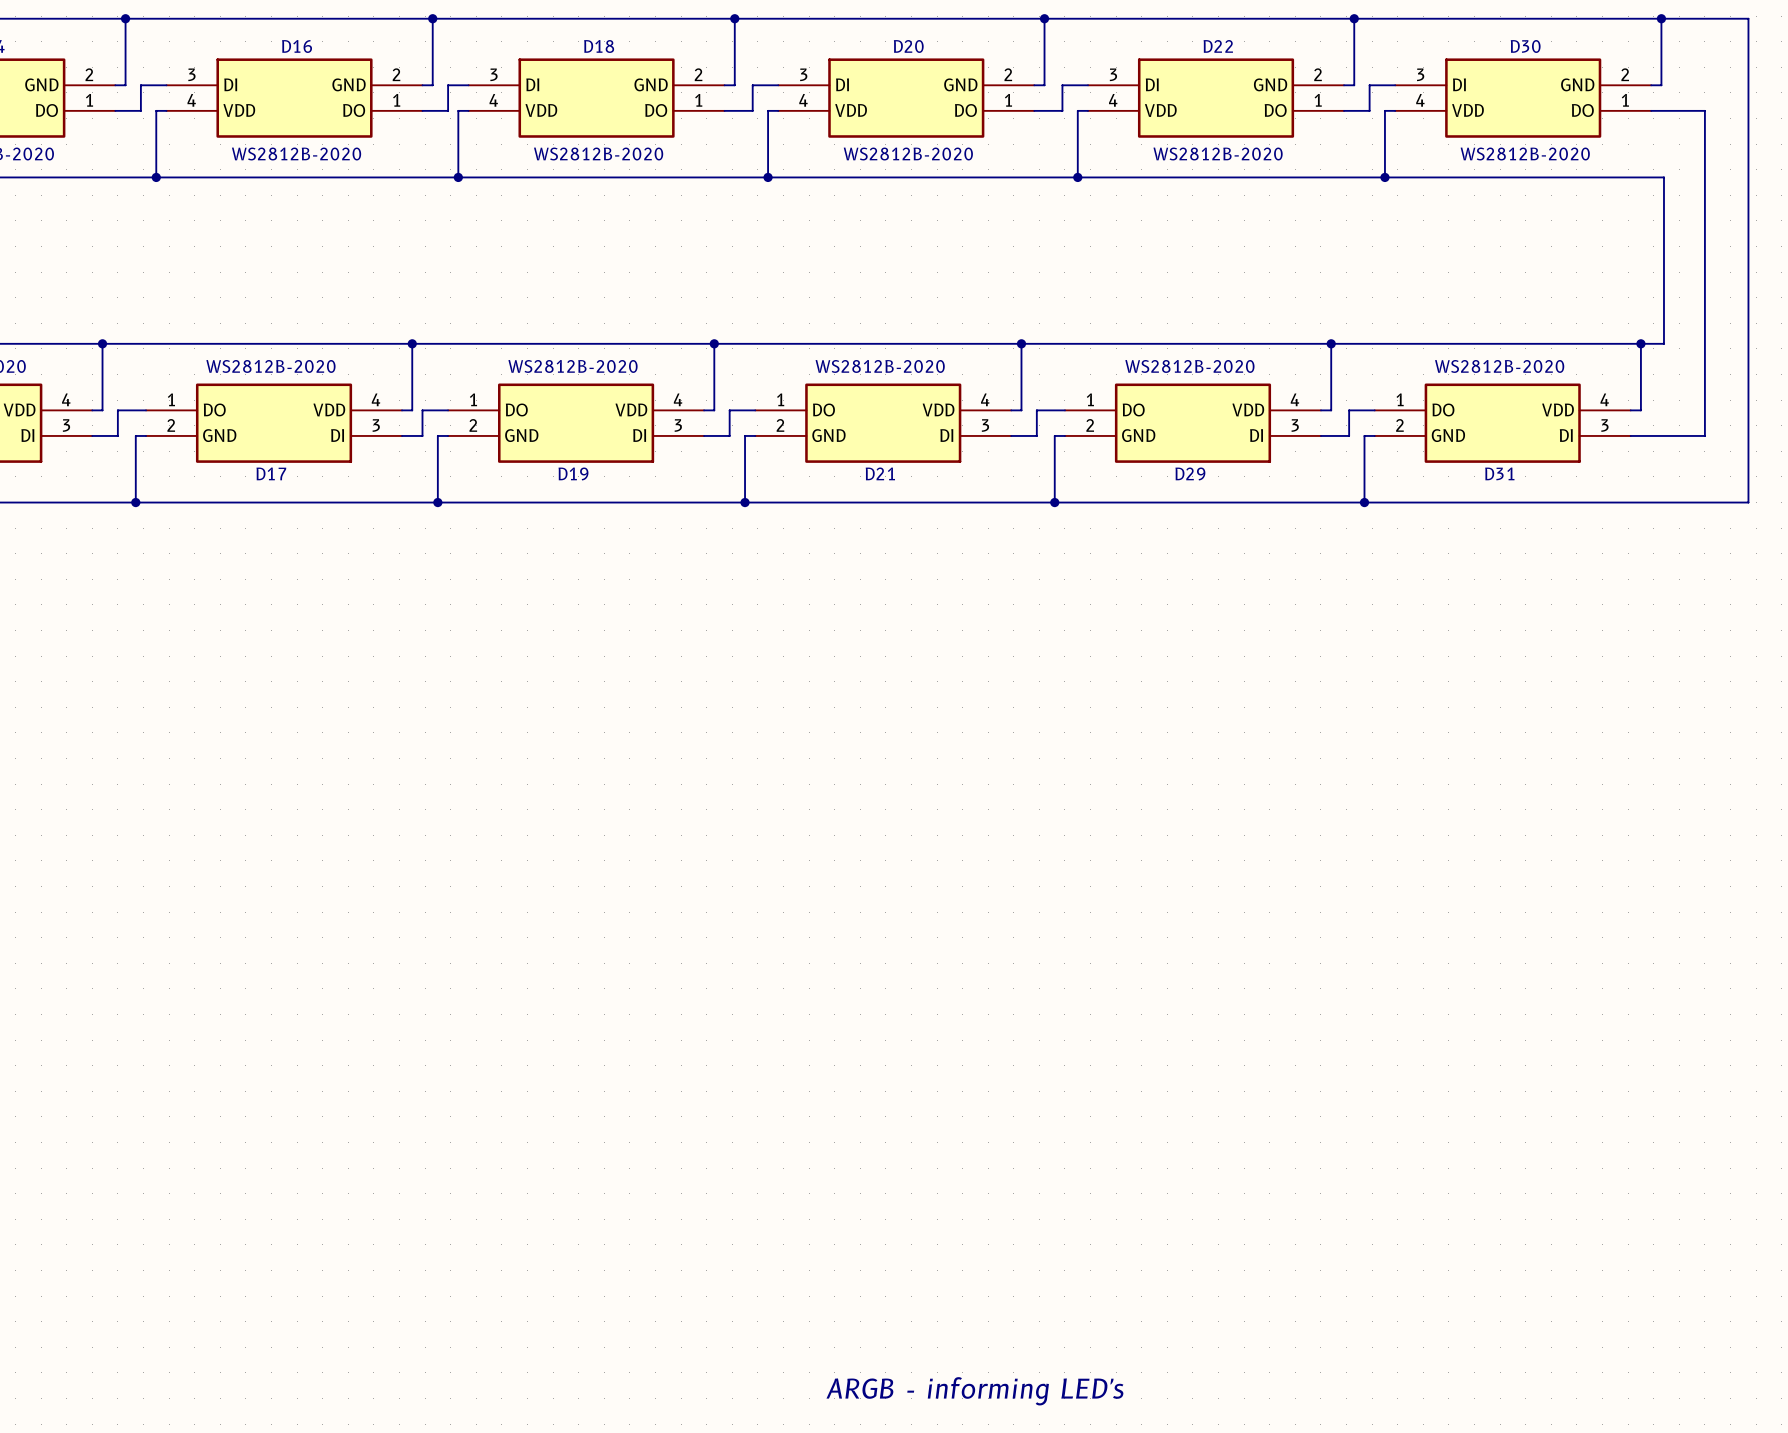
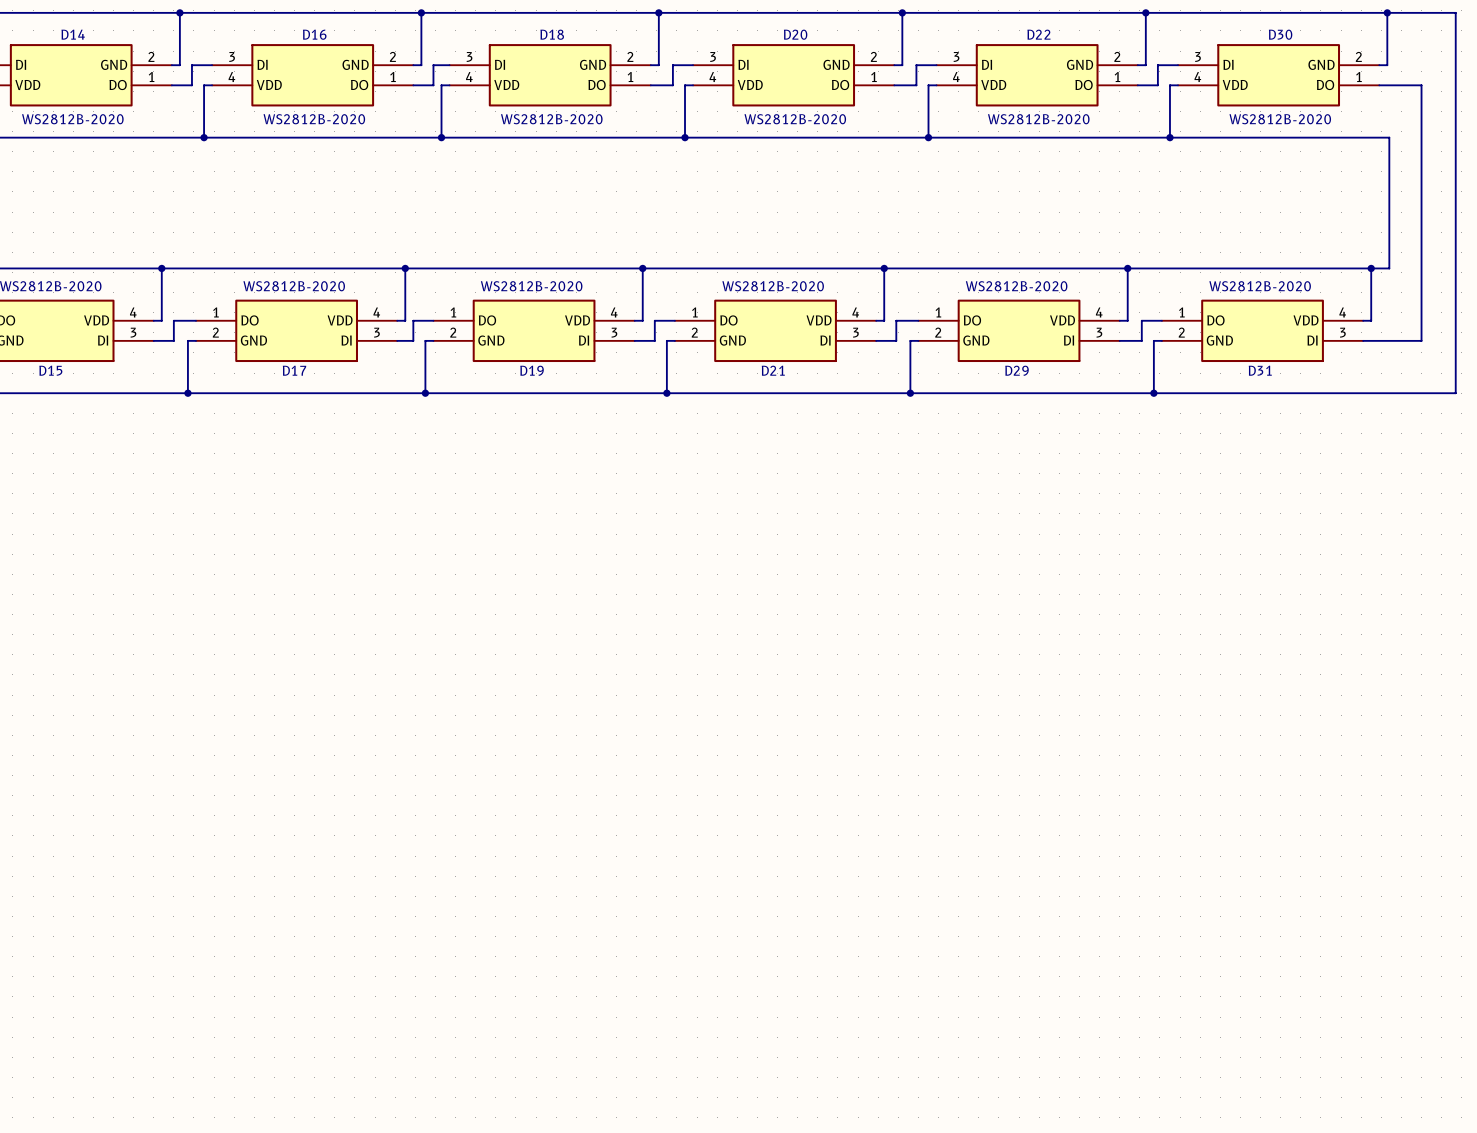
text: ARGB - informing LED's (974, 1391) -> none

